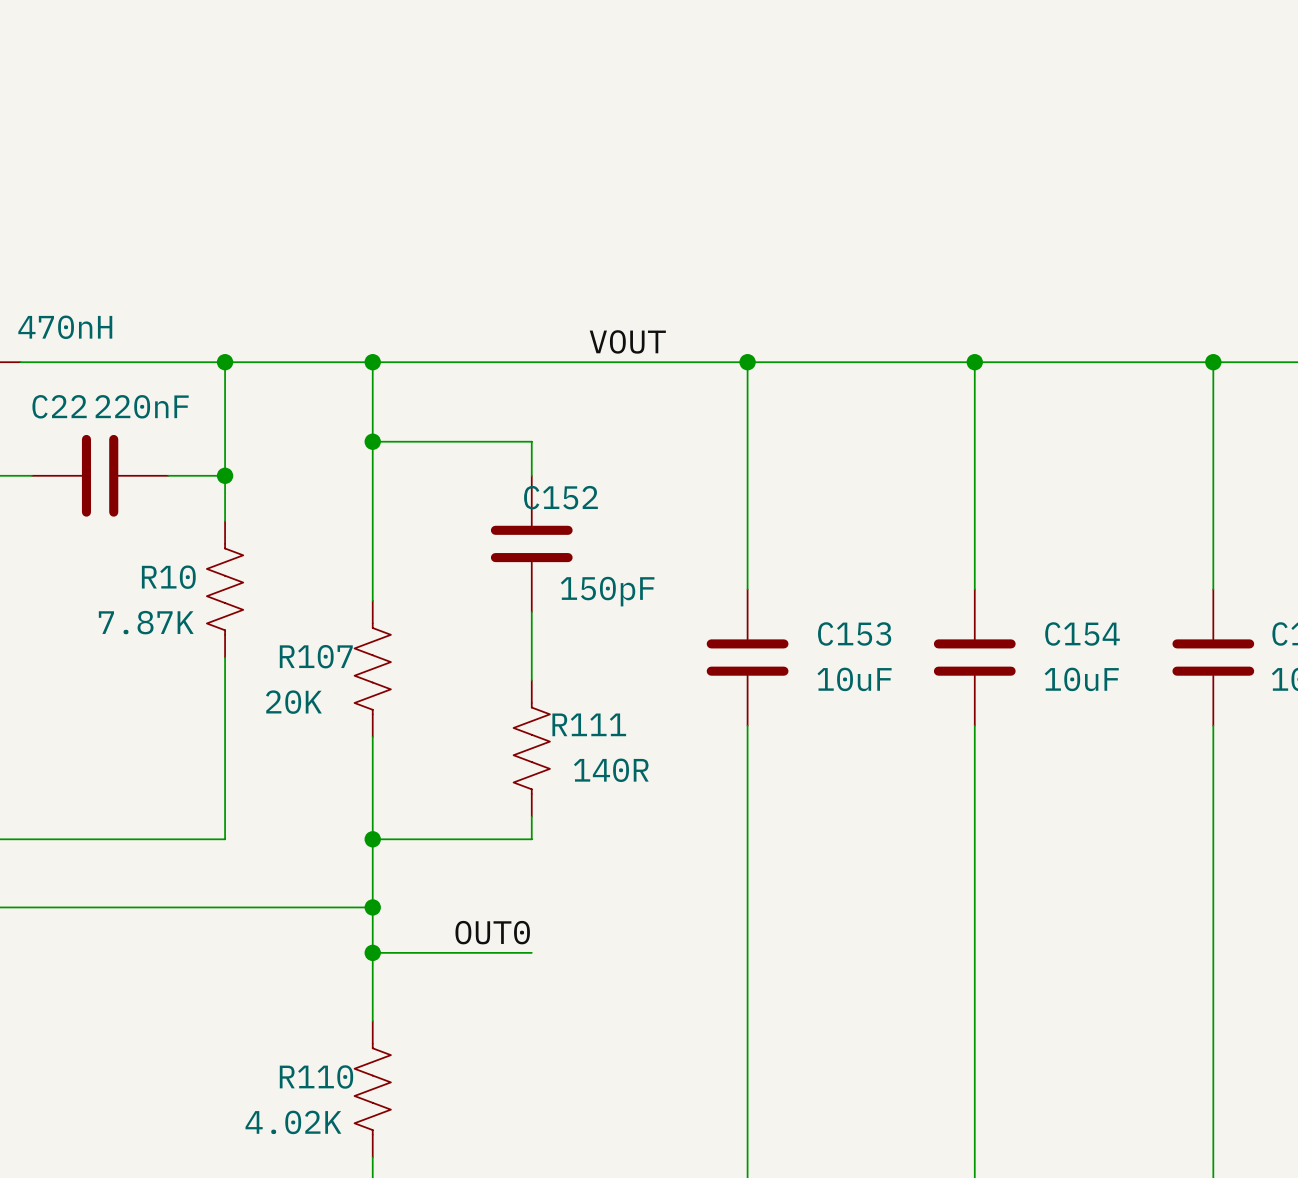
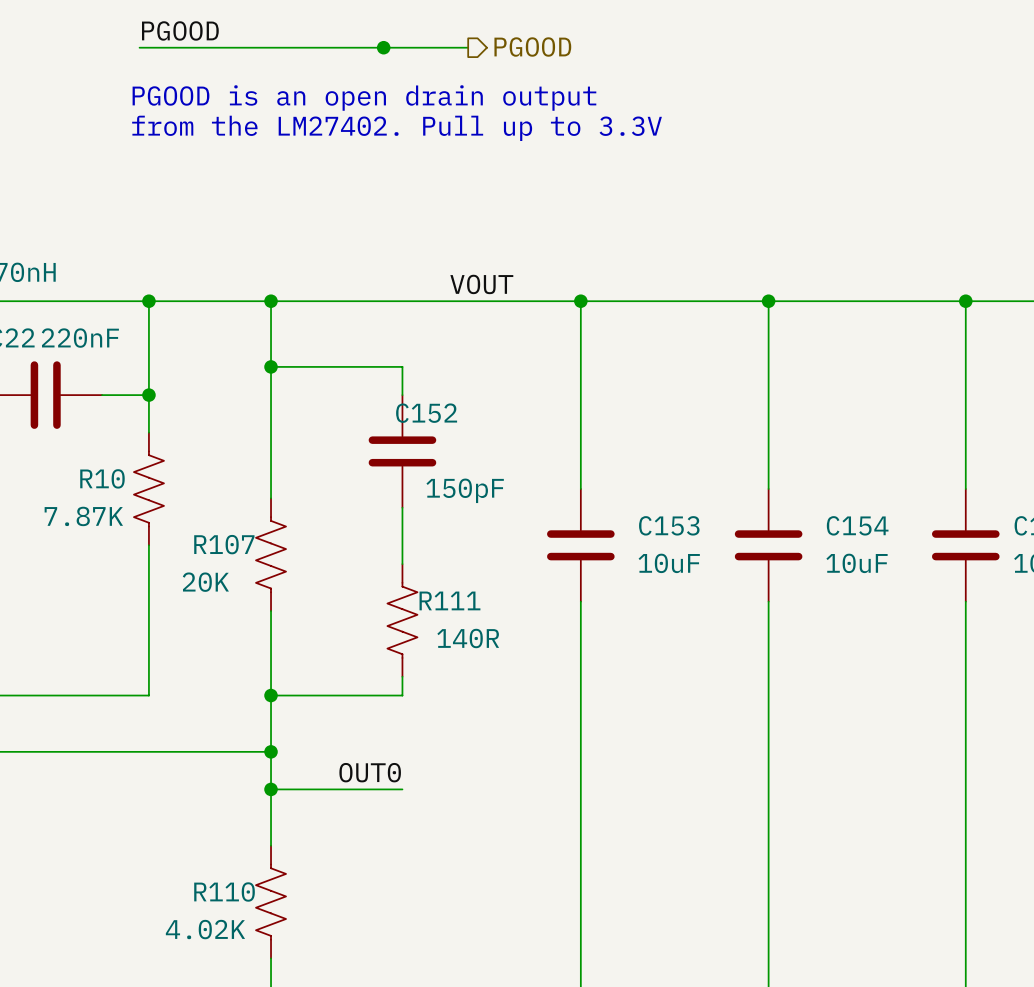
label: none -> PGOOD (180, 30)
hierarchical label: none -> PGOOD (532, 47)
wire: none -> (139, 47) (468, 47)
junction: none -> (383, 47)
text: none -> PGOOD is an open drain output (364, 98)
text: none -> from the LM27402. Pull up to 3.3V (397, 128)

